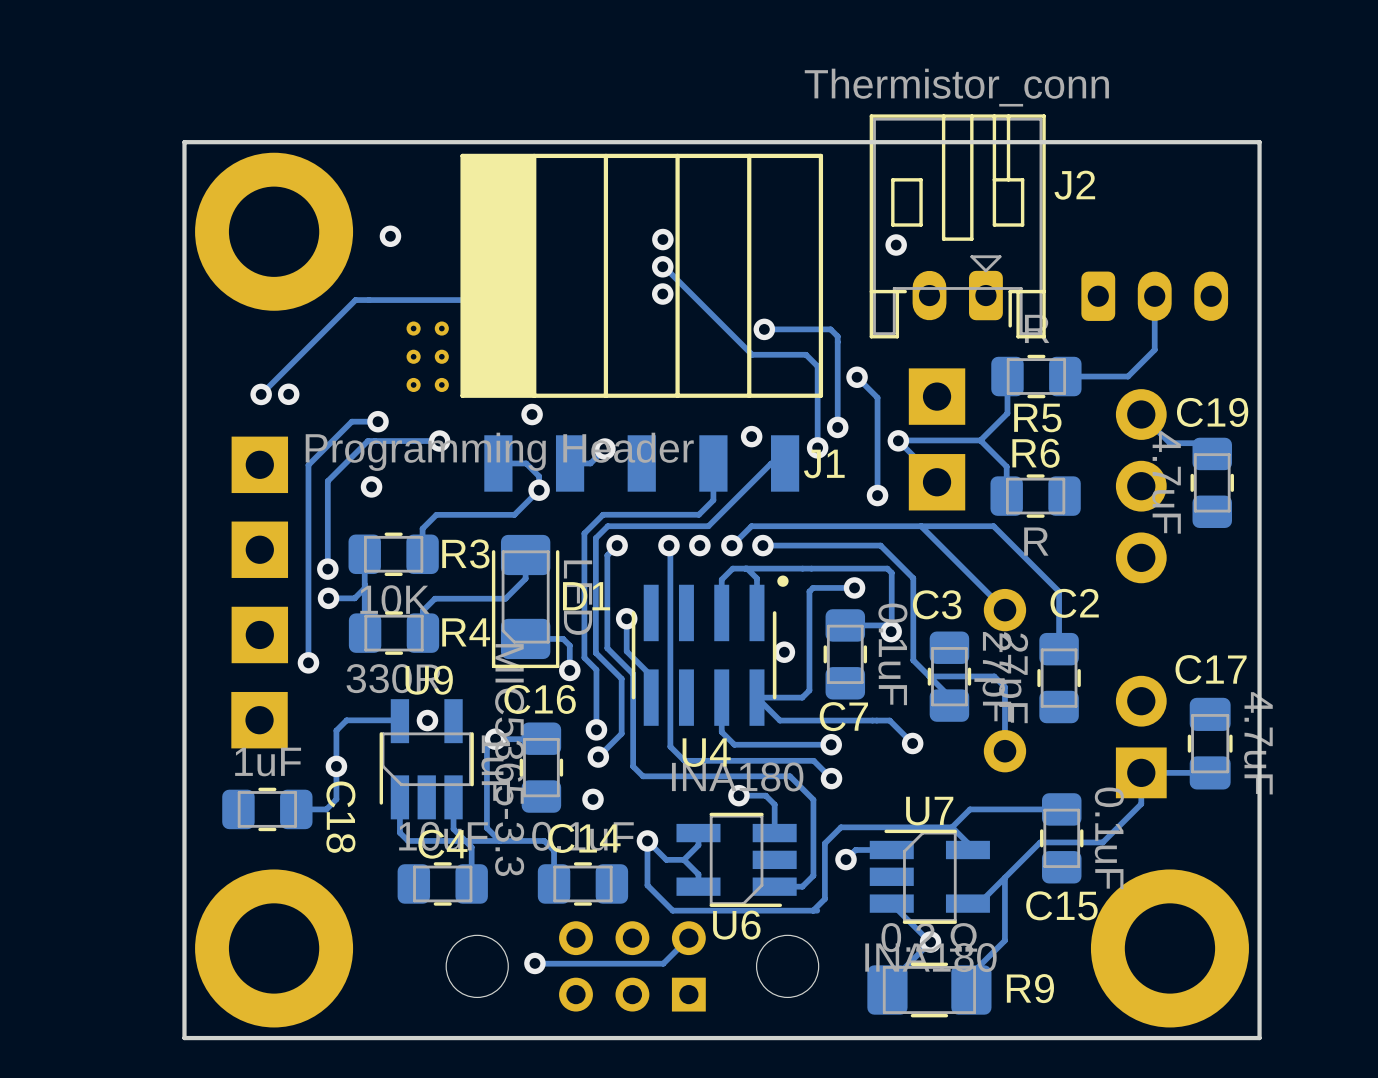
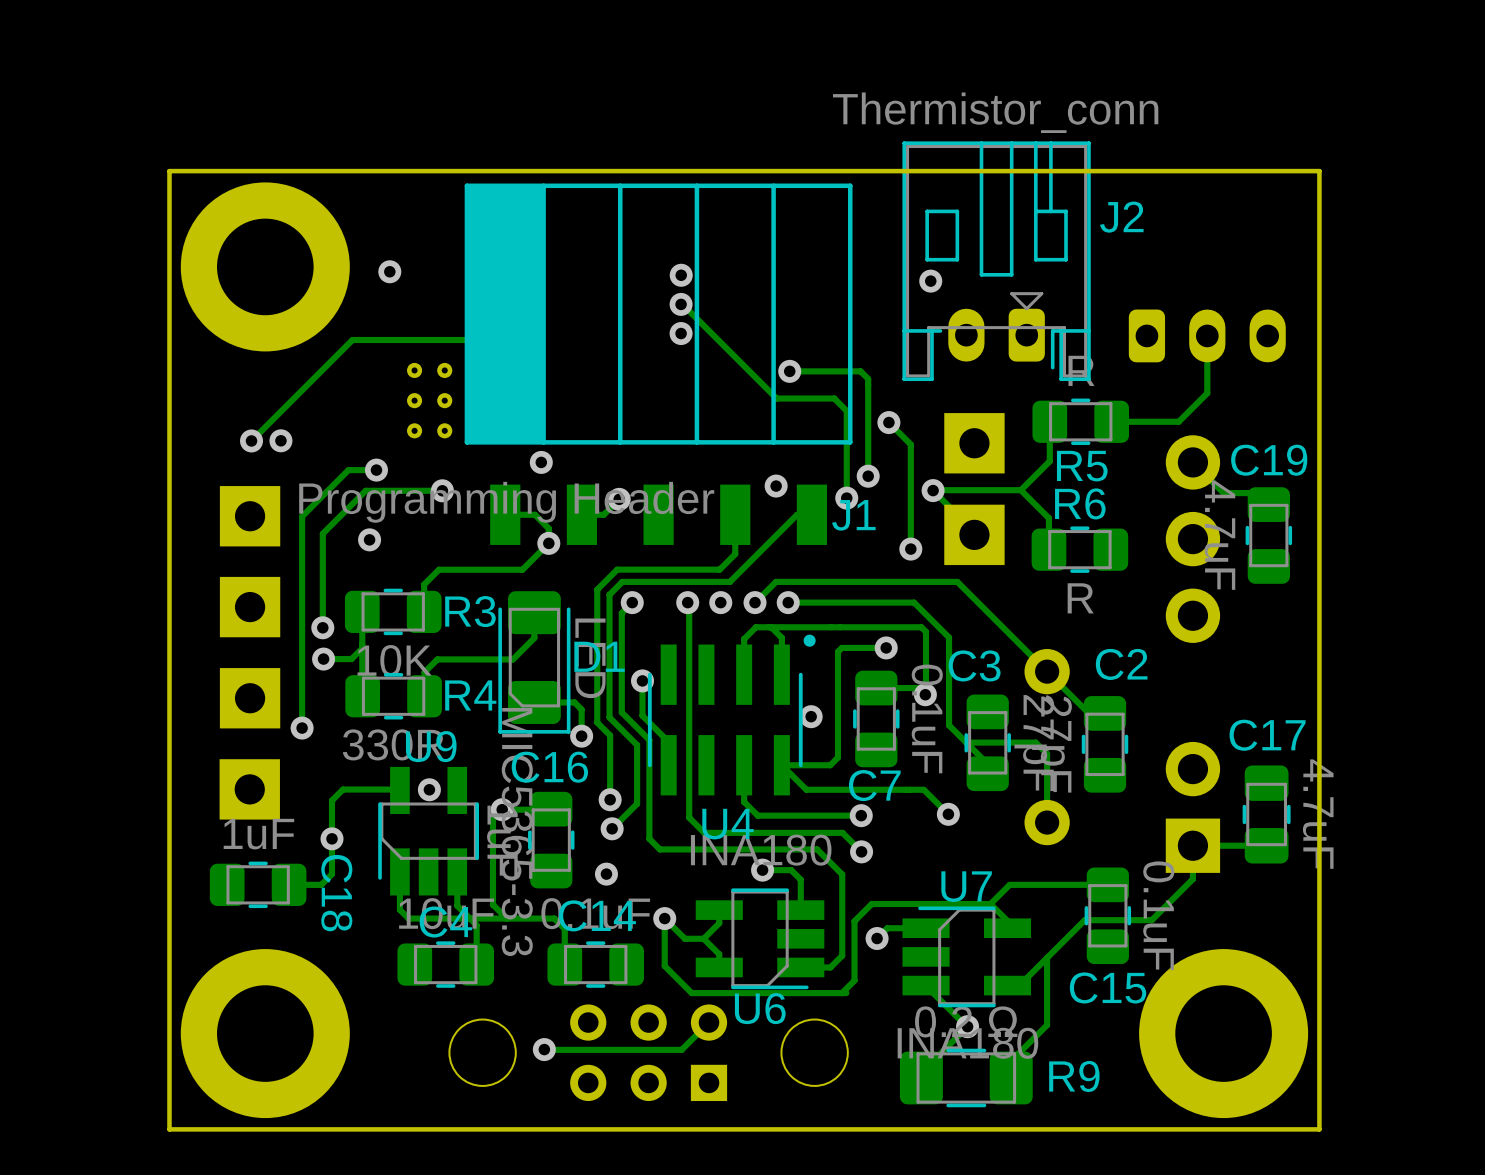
track: (921, 526) (993, 526) (1059, 591) (1059, 649) -> none
track: none -> (1047, 671) (1088, 713)

